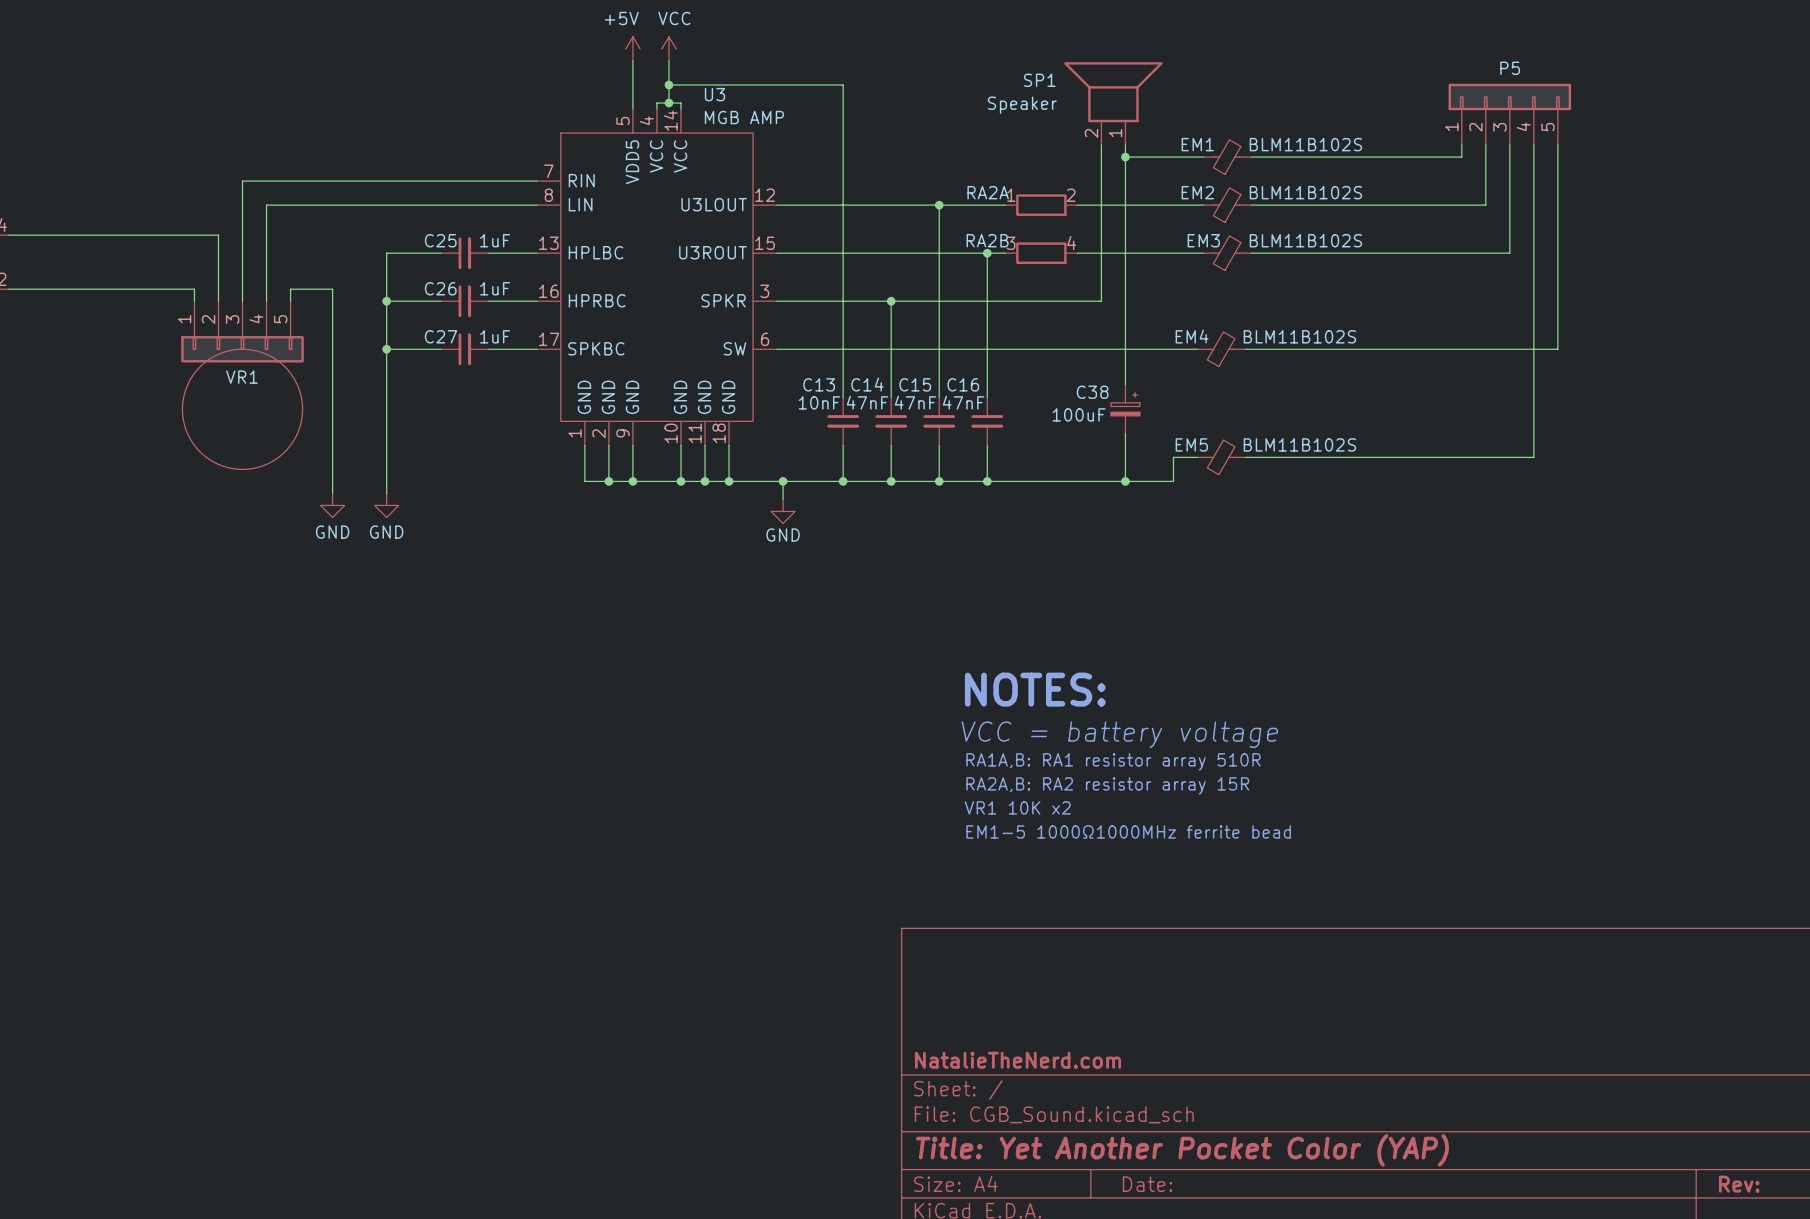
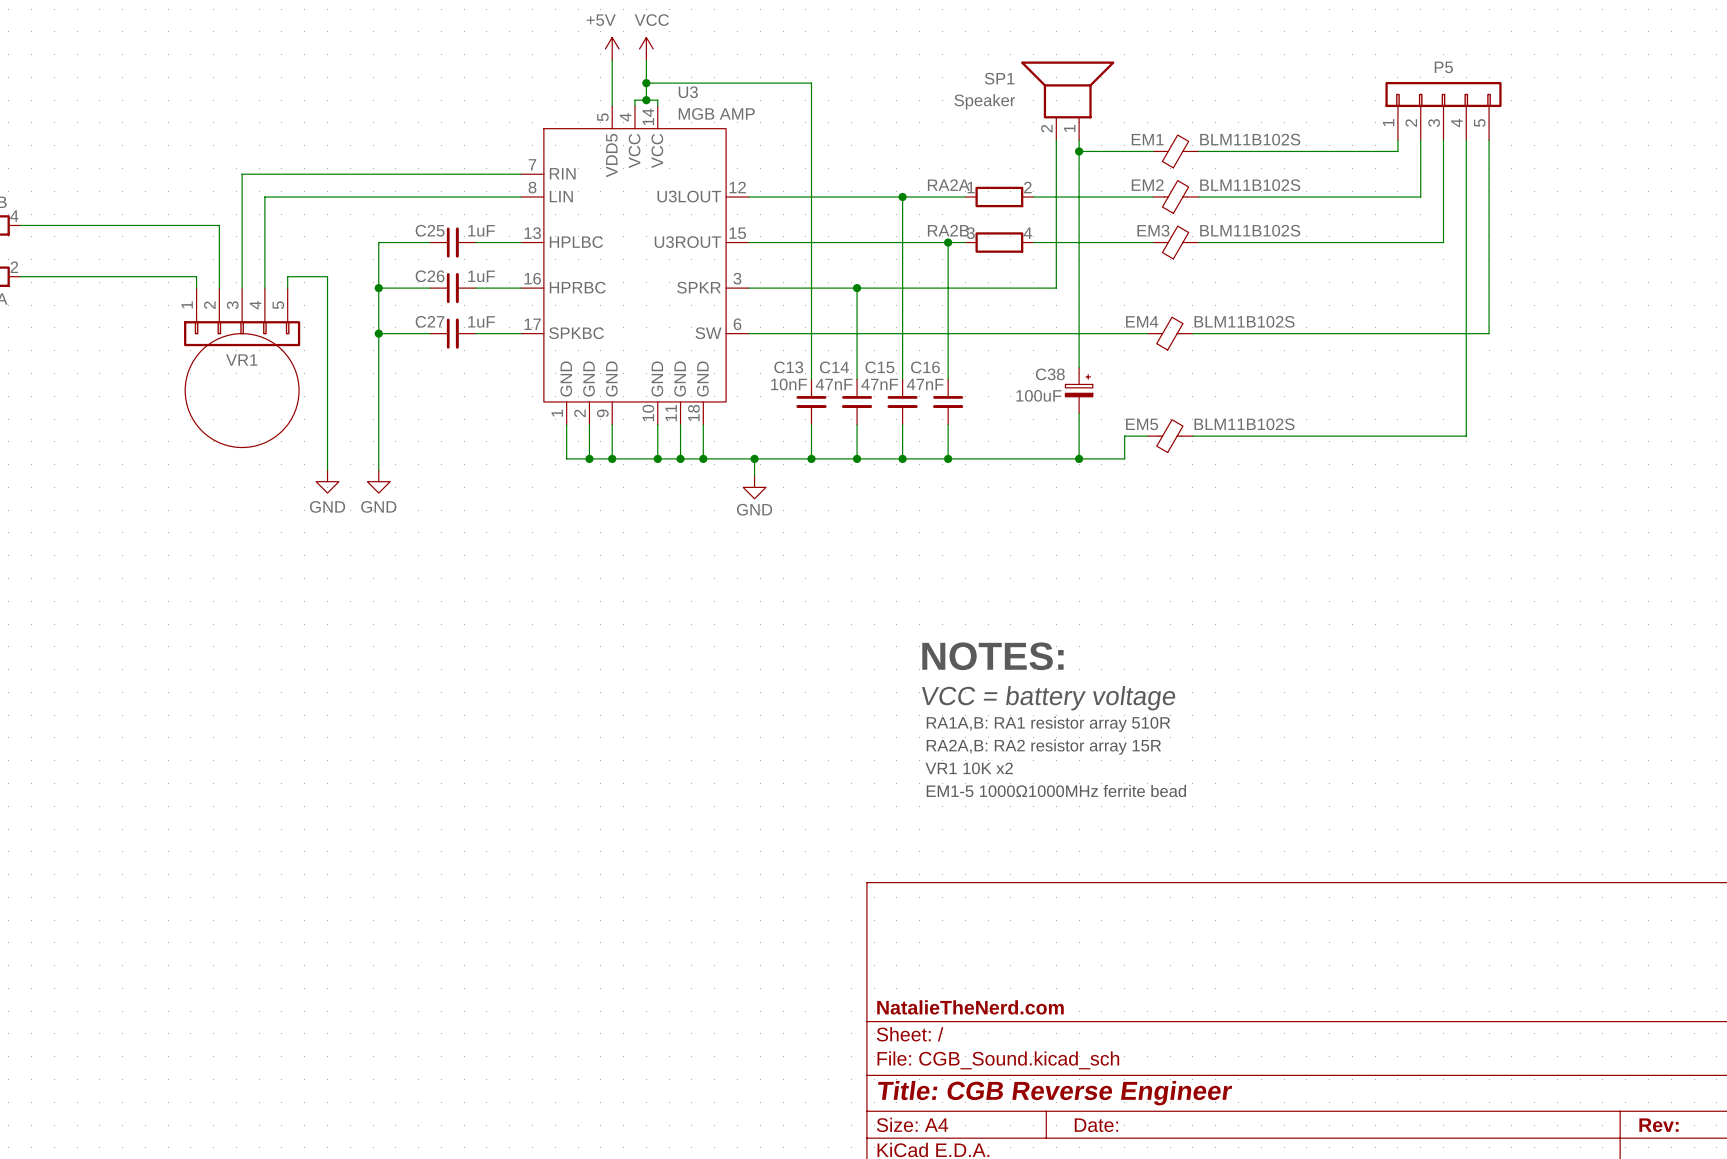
title block: Title: Yet Another Pocket Color (YAP) (1182, 1150) -> Title: CGB Reverse Engineer (1055, 1093)

